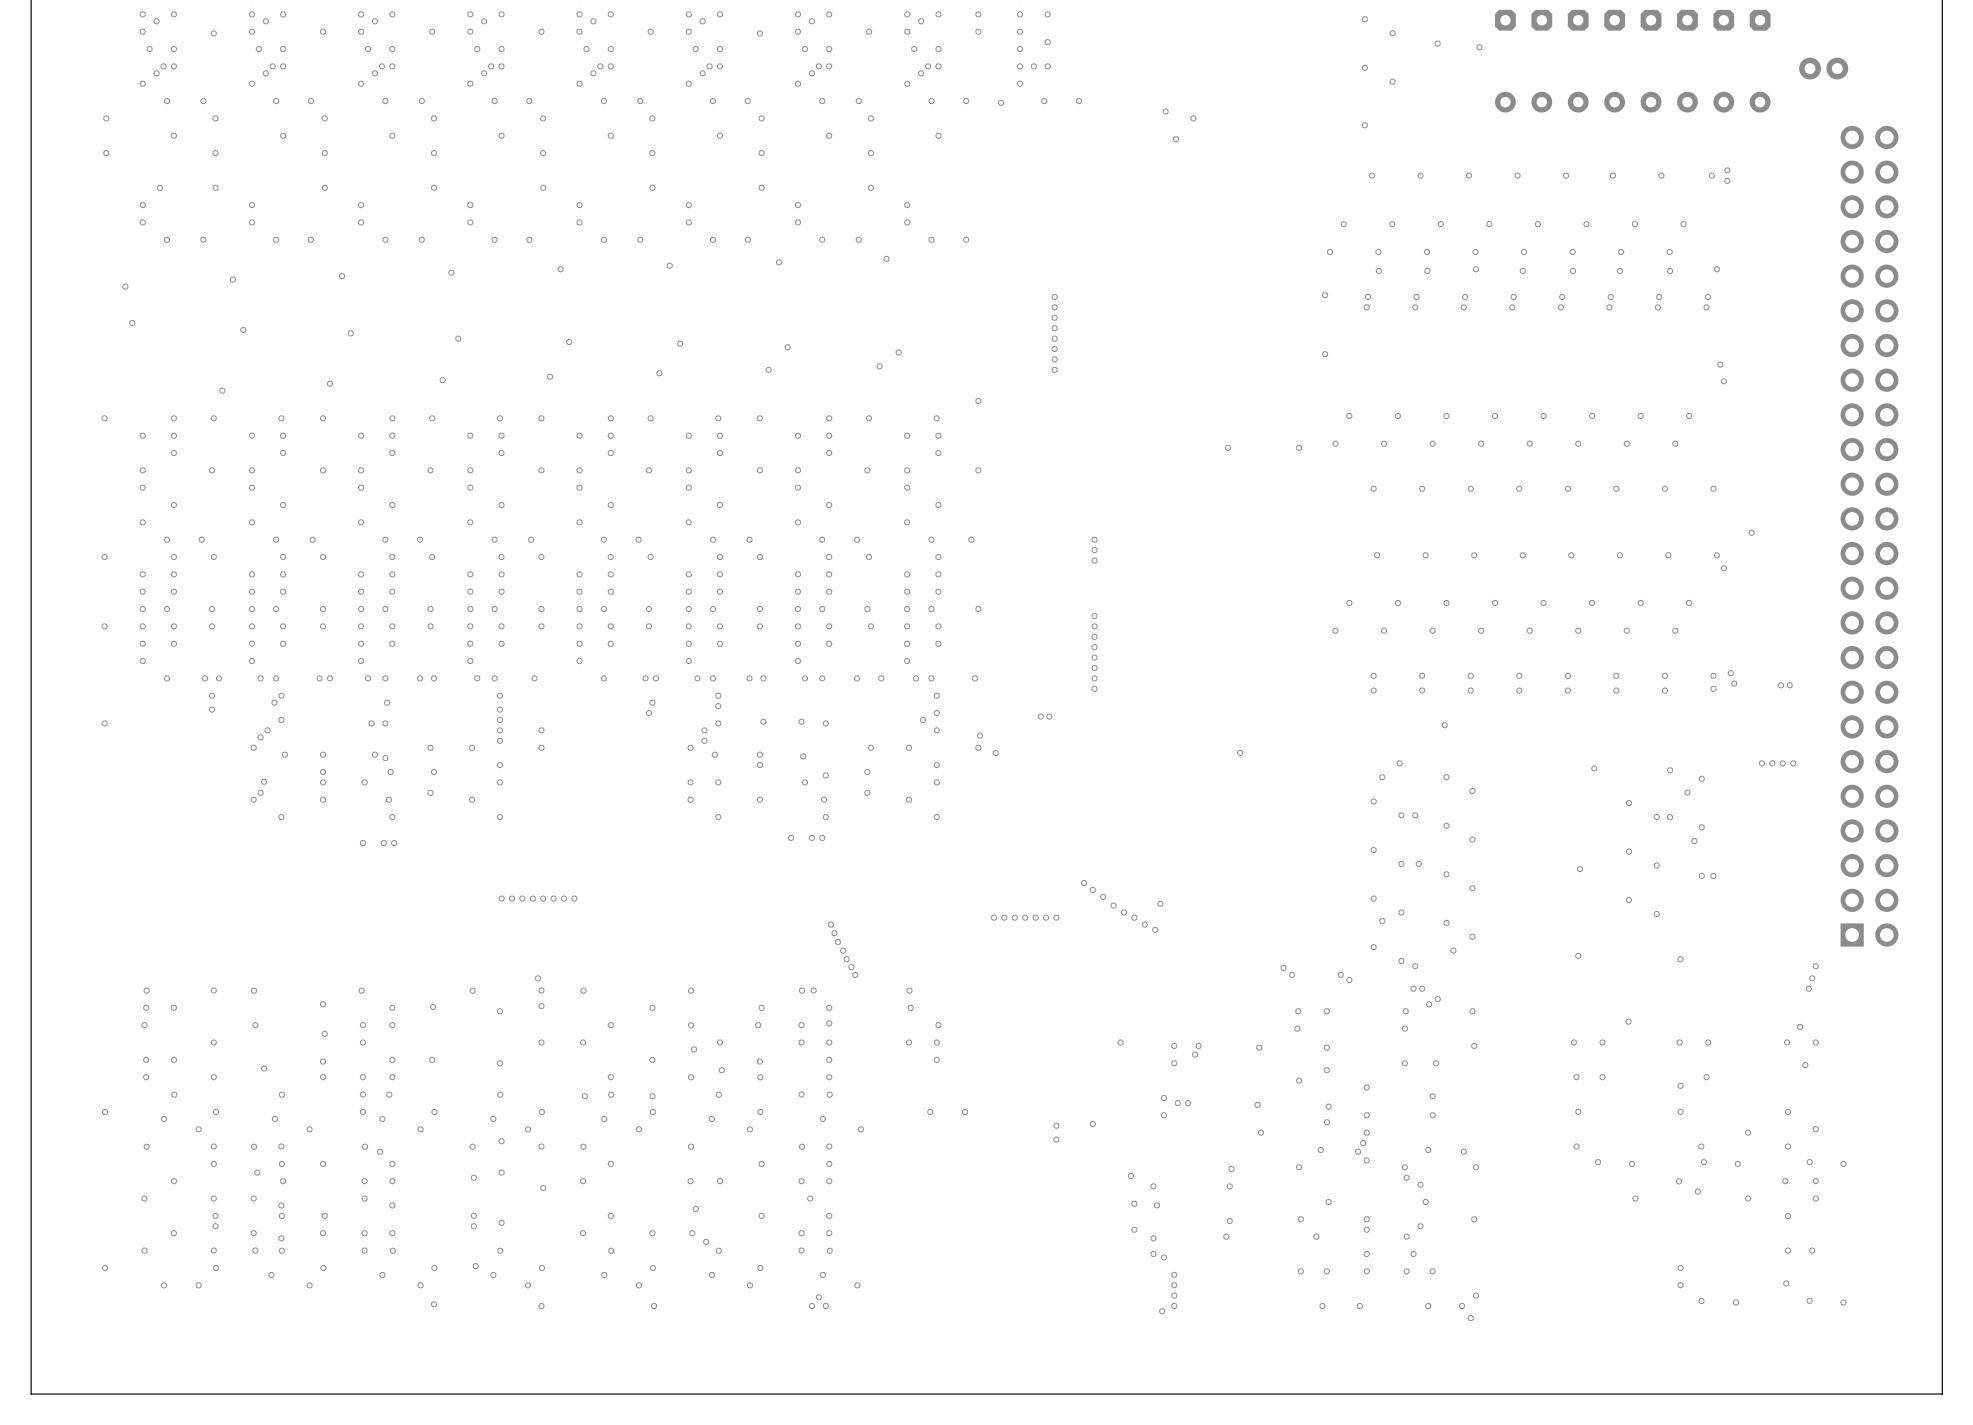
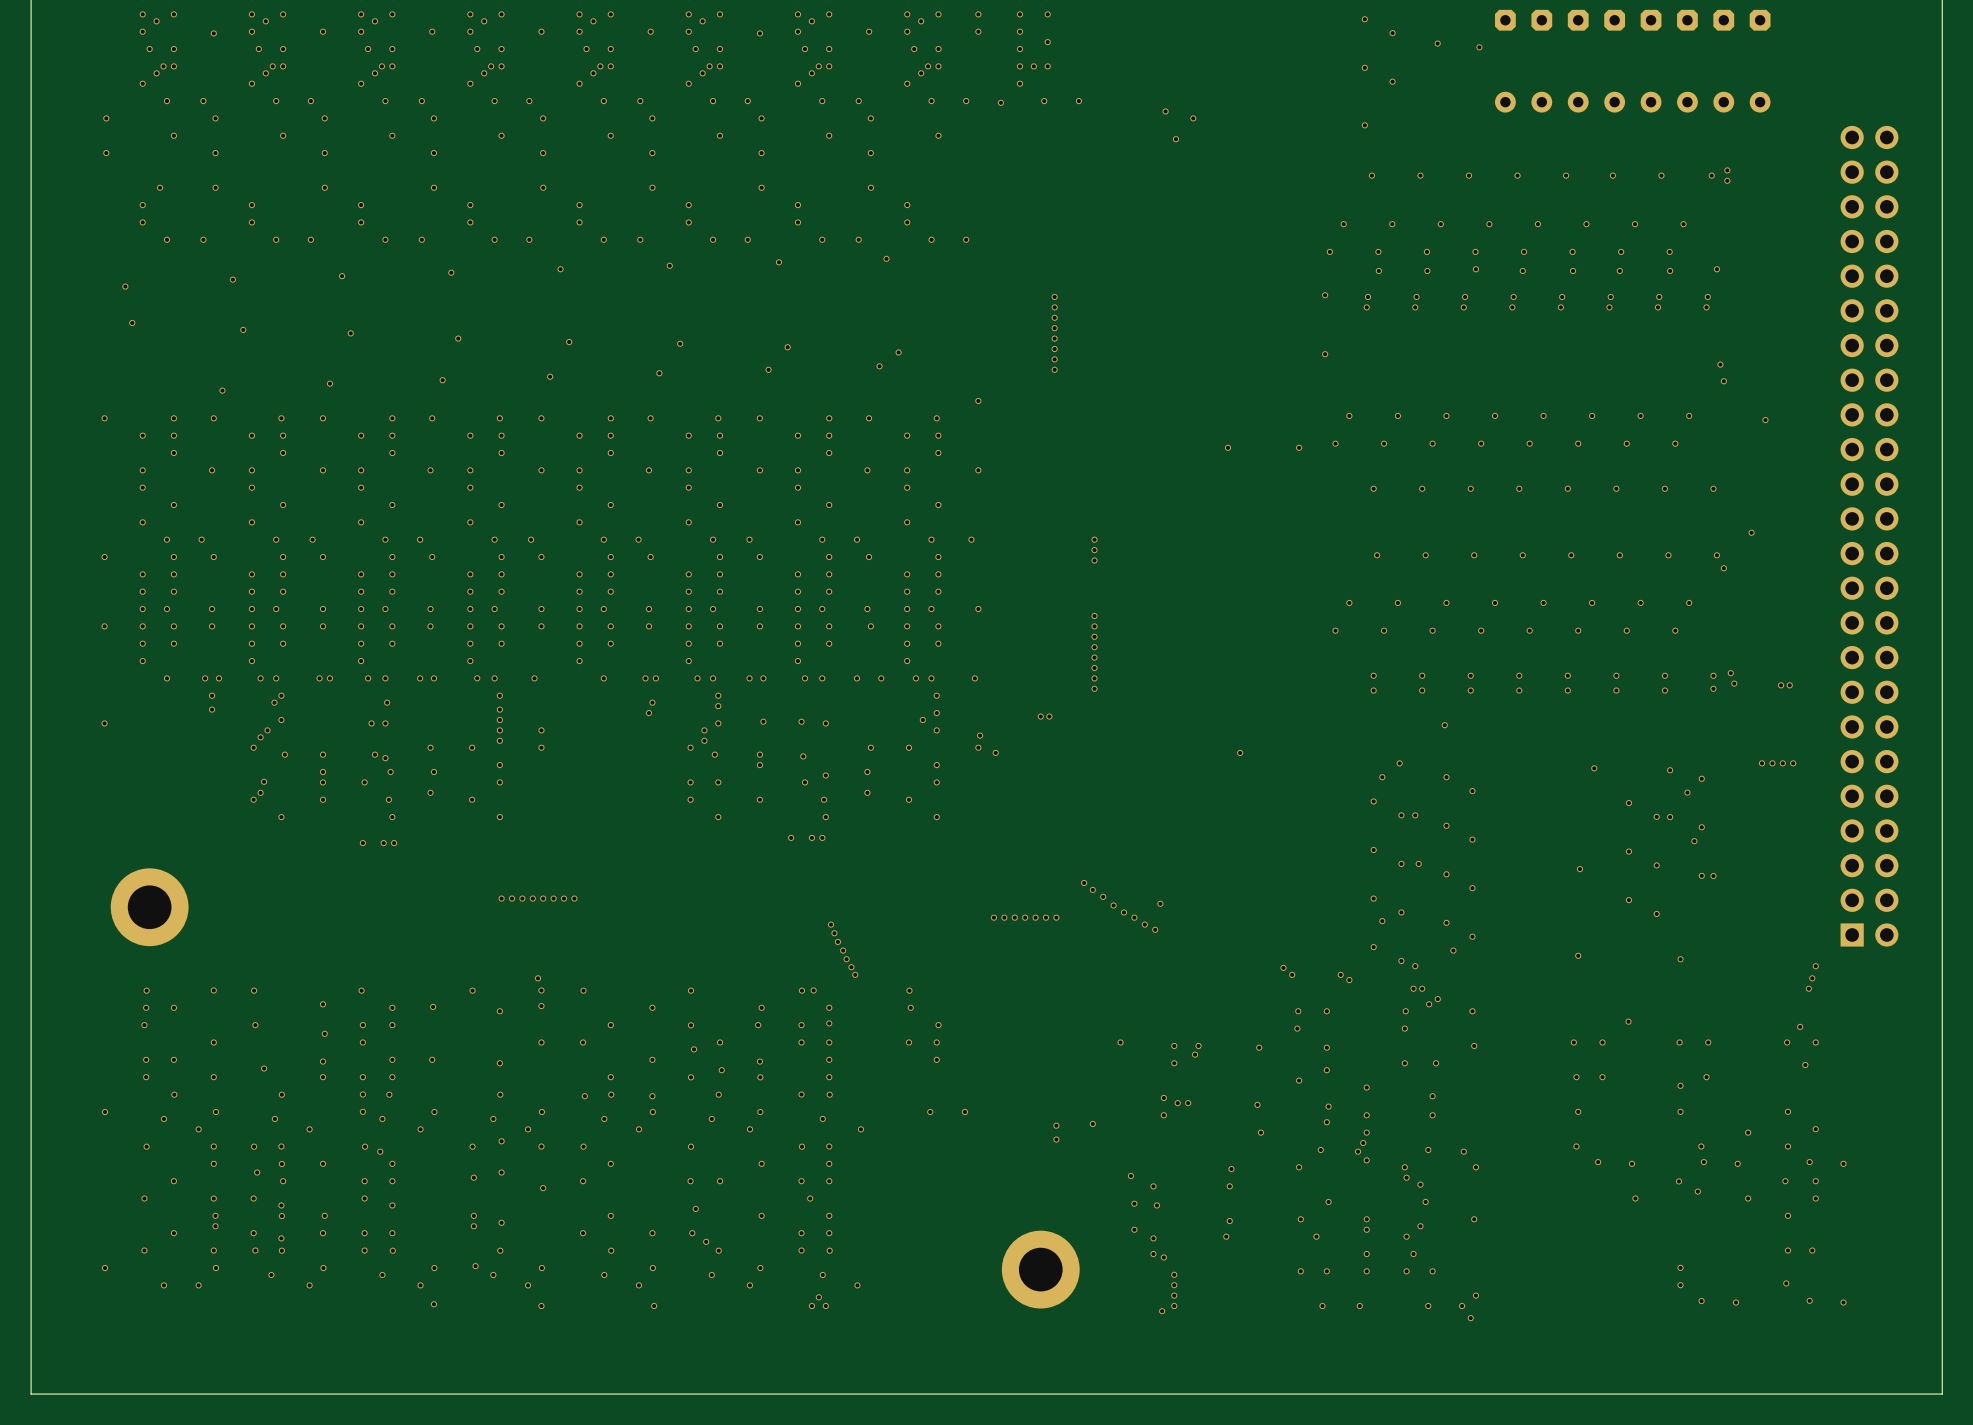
part: (1823, 68) -> none
via: none -> (1765, 420)
part: none -> (149, 907)
part: none -> (1040, 1269)

